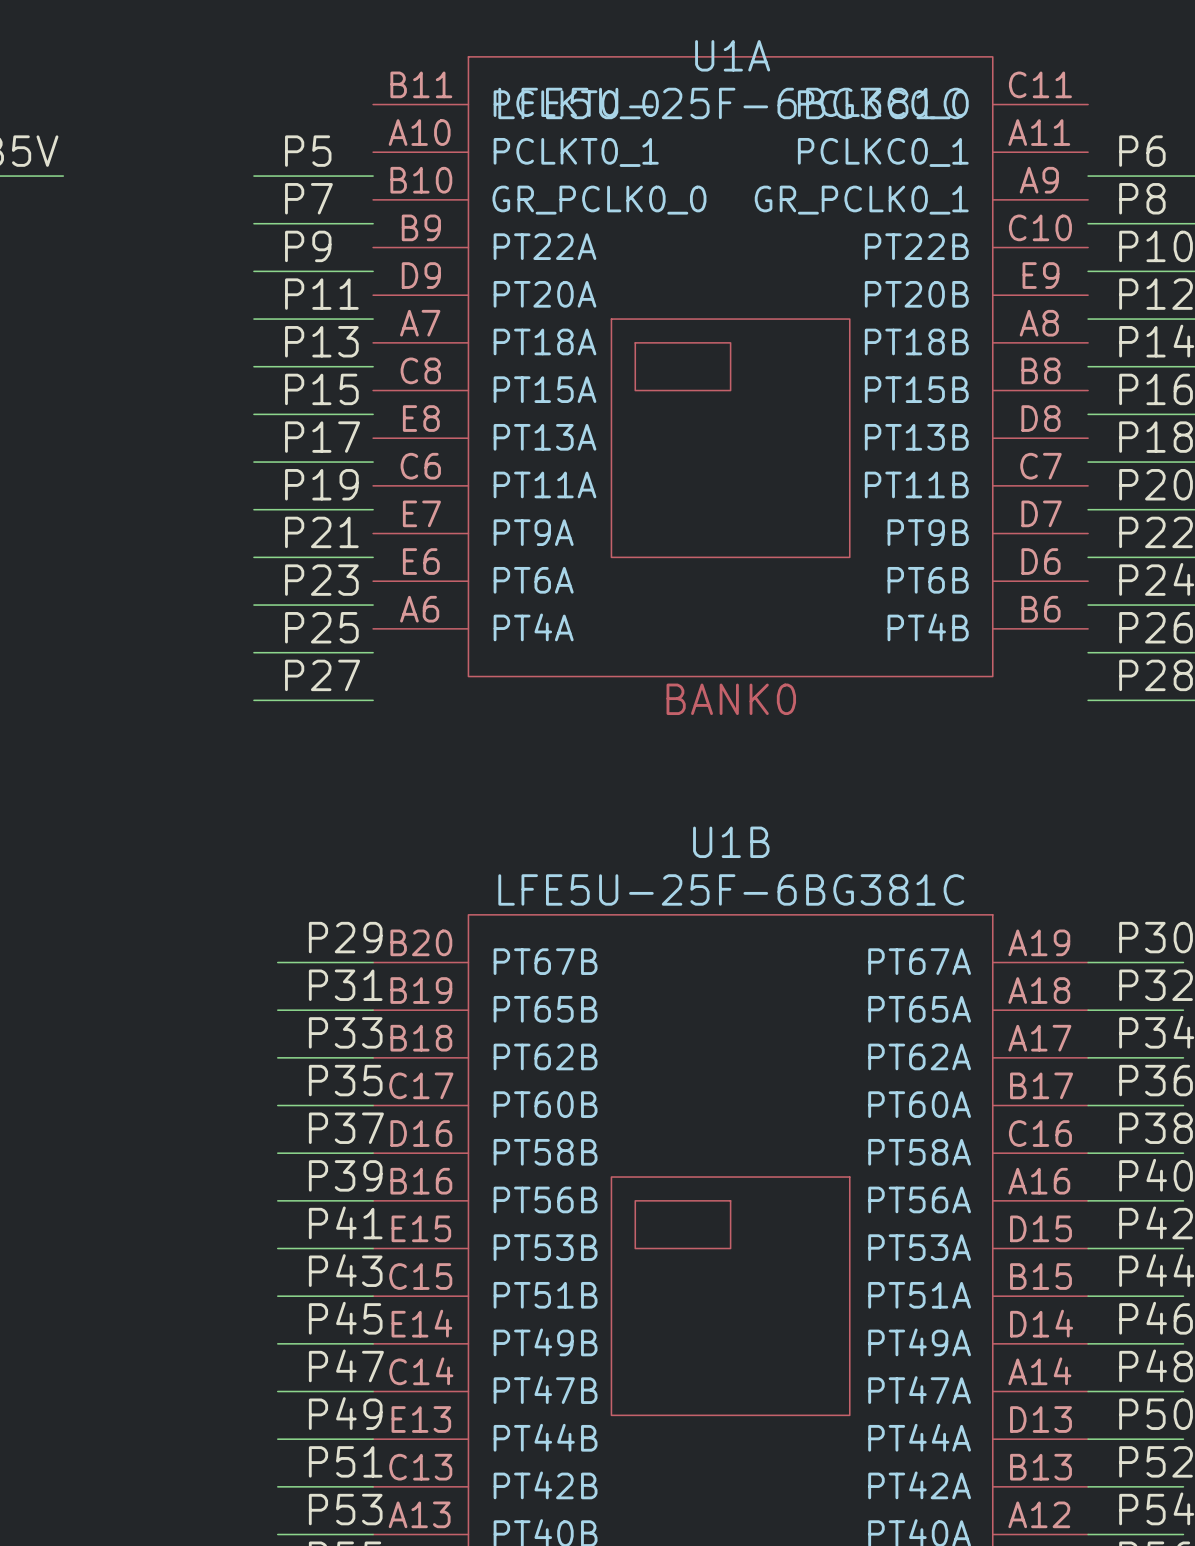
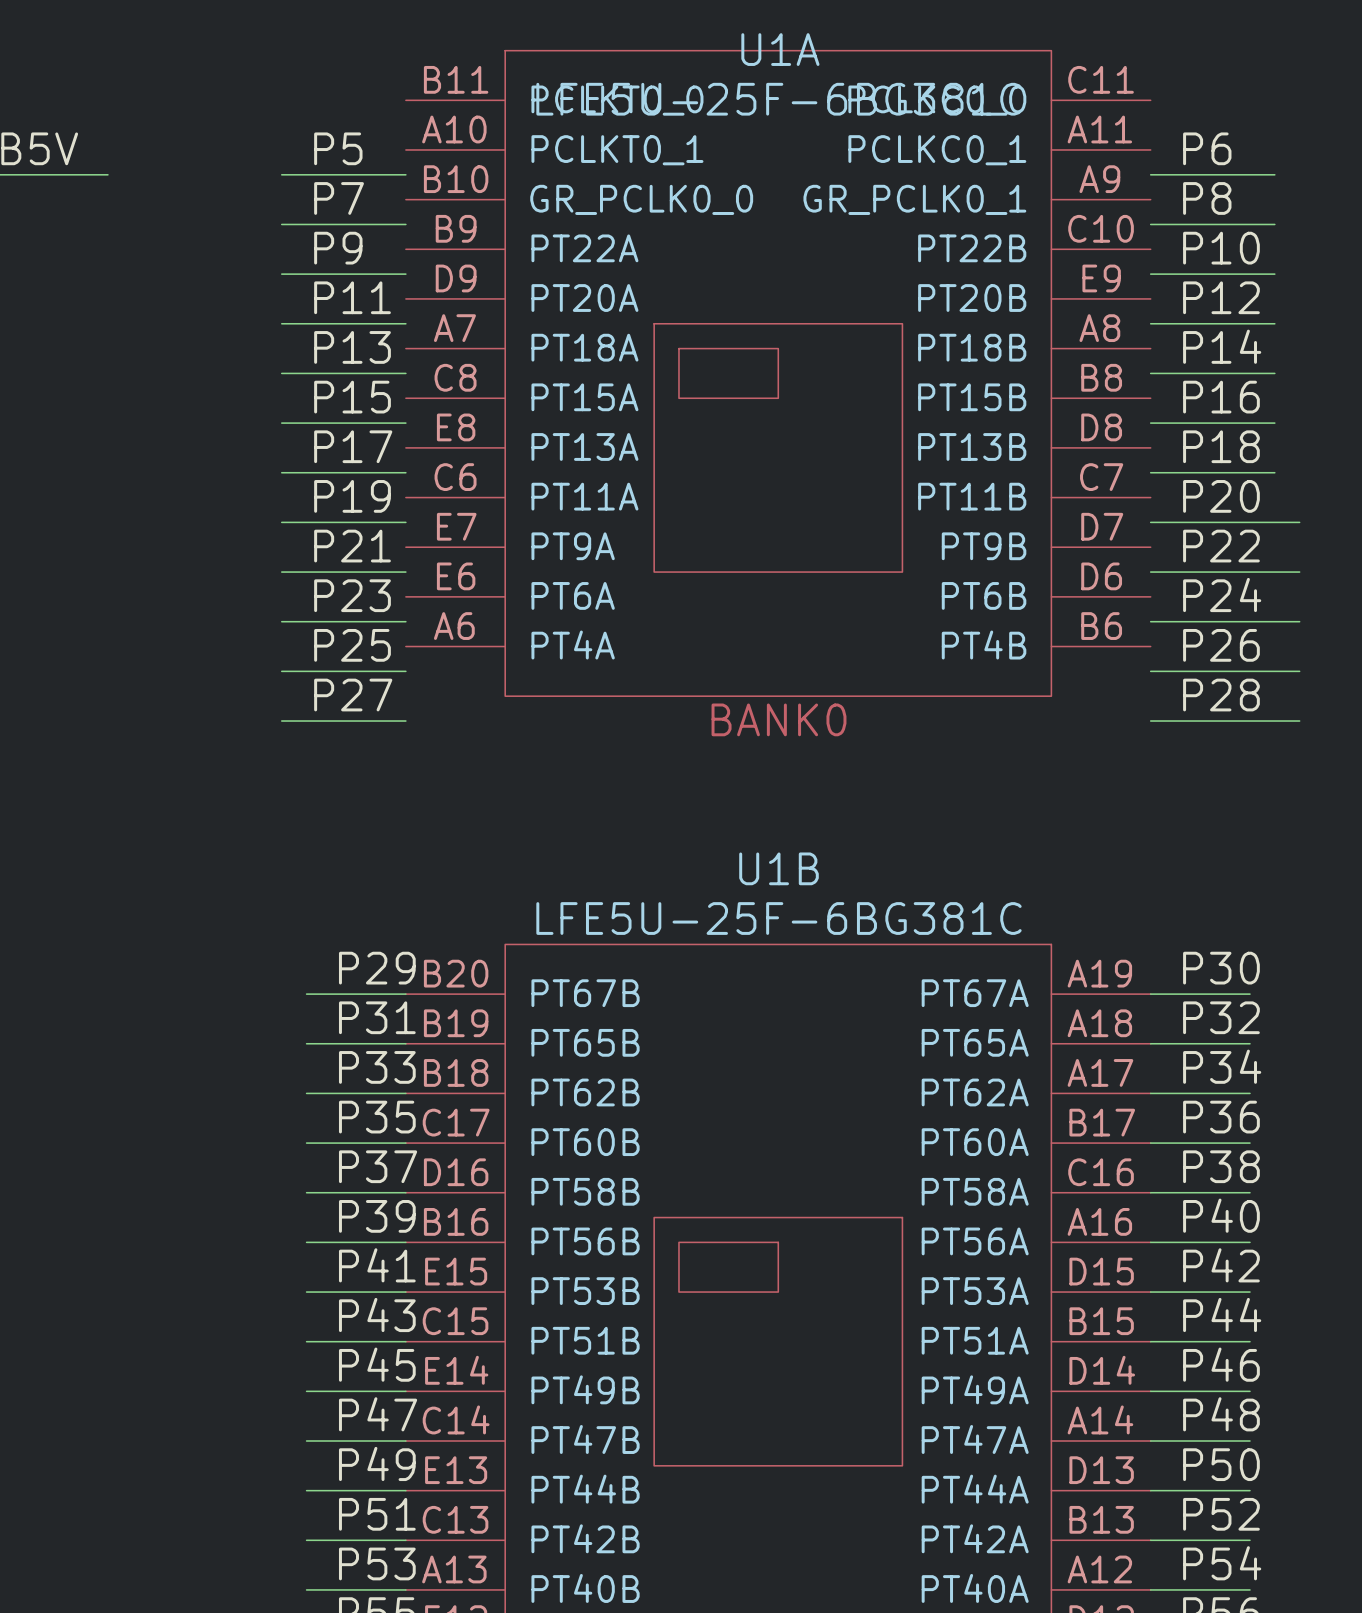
wire: none -> (83, 174) (107, 174)

